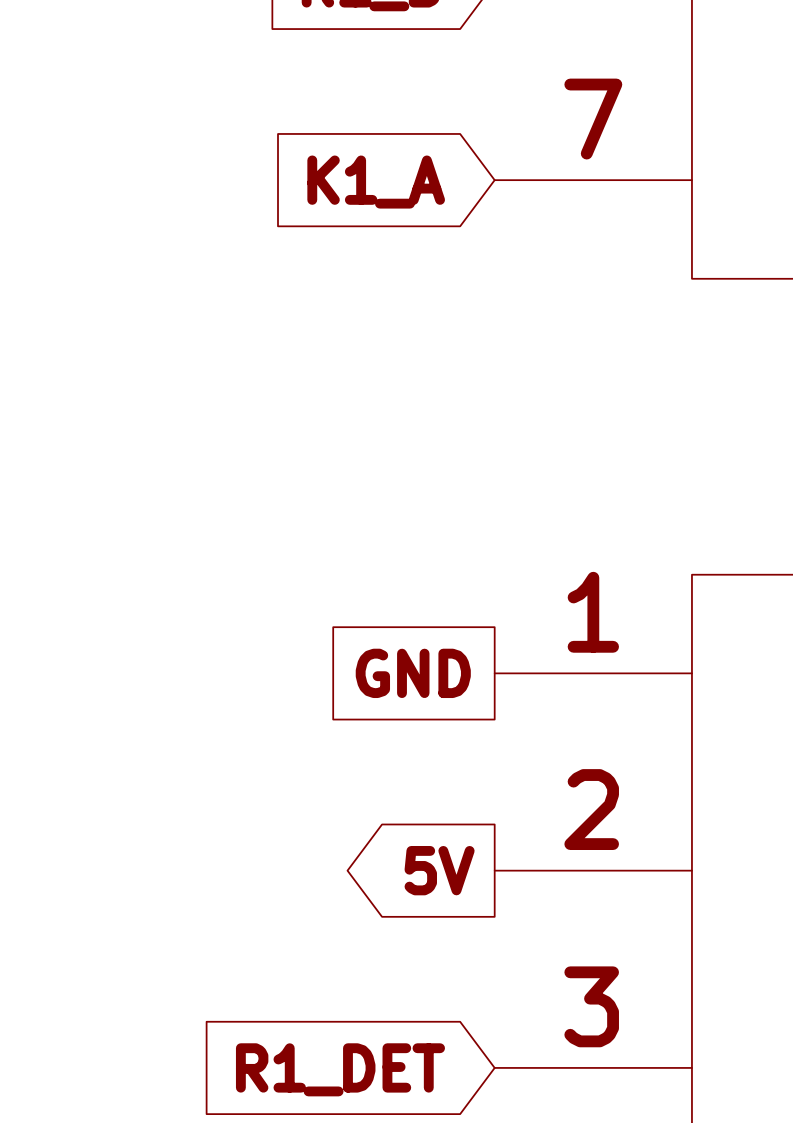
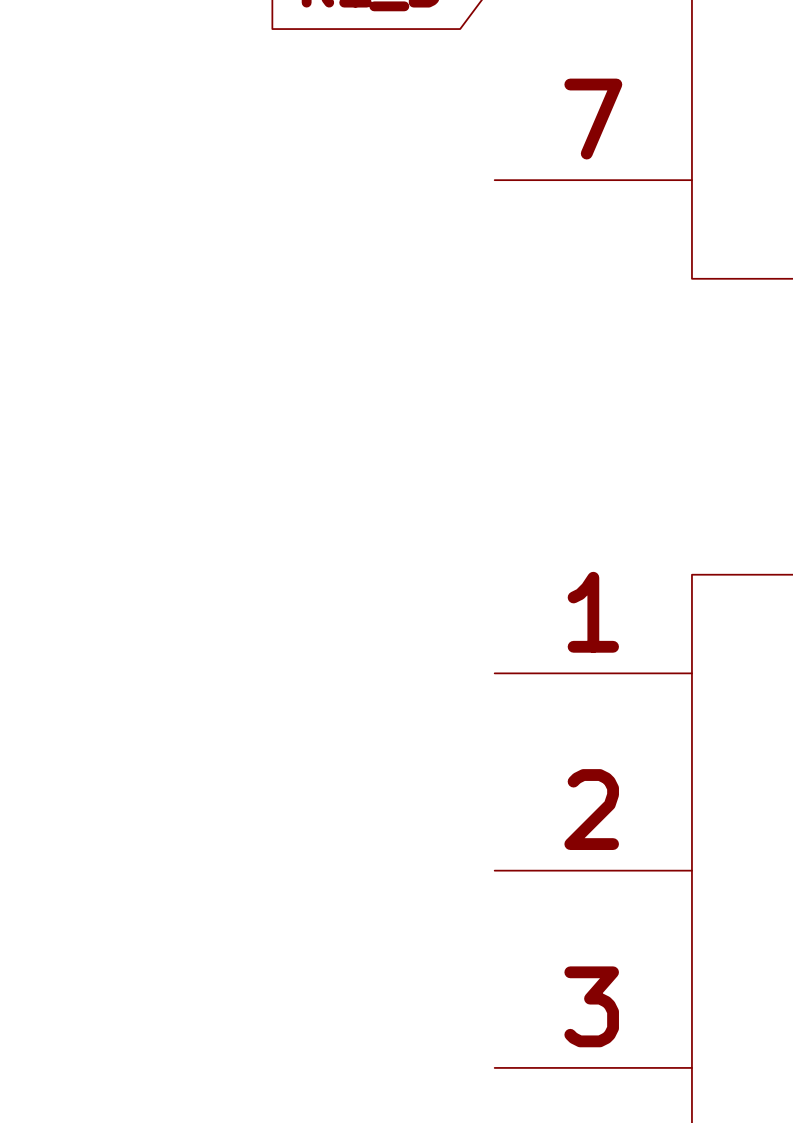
global label: K1_A (376, 182) -> none
global label: GND (413, 673) -> none
global label: 5V (439, 870) -> none
global label: R1_DET (340, 1069) -> none

